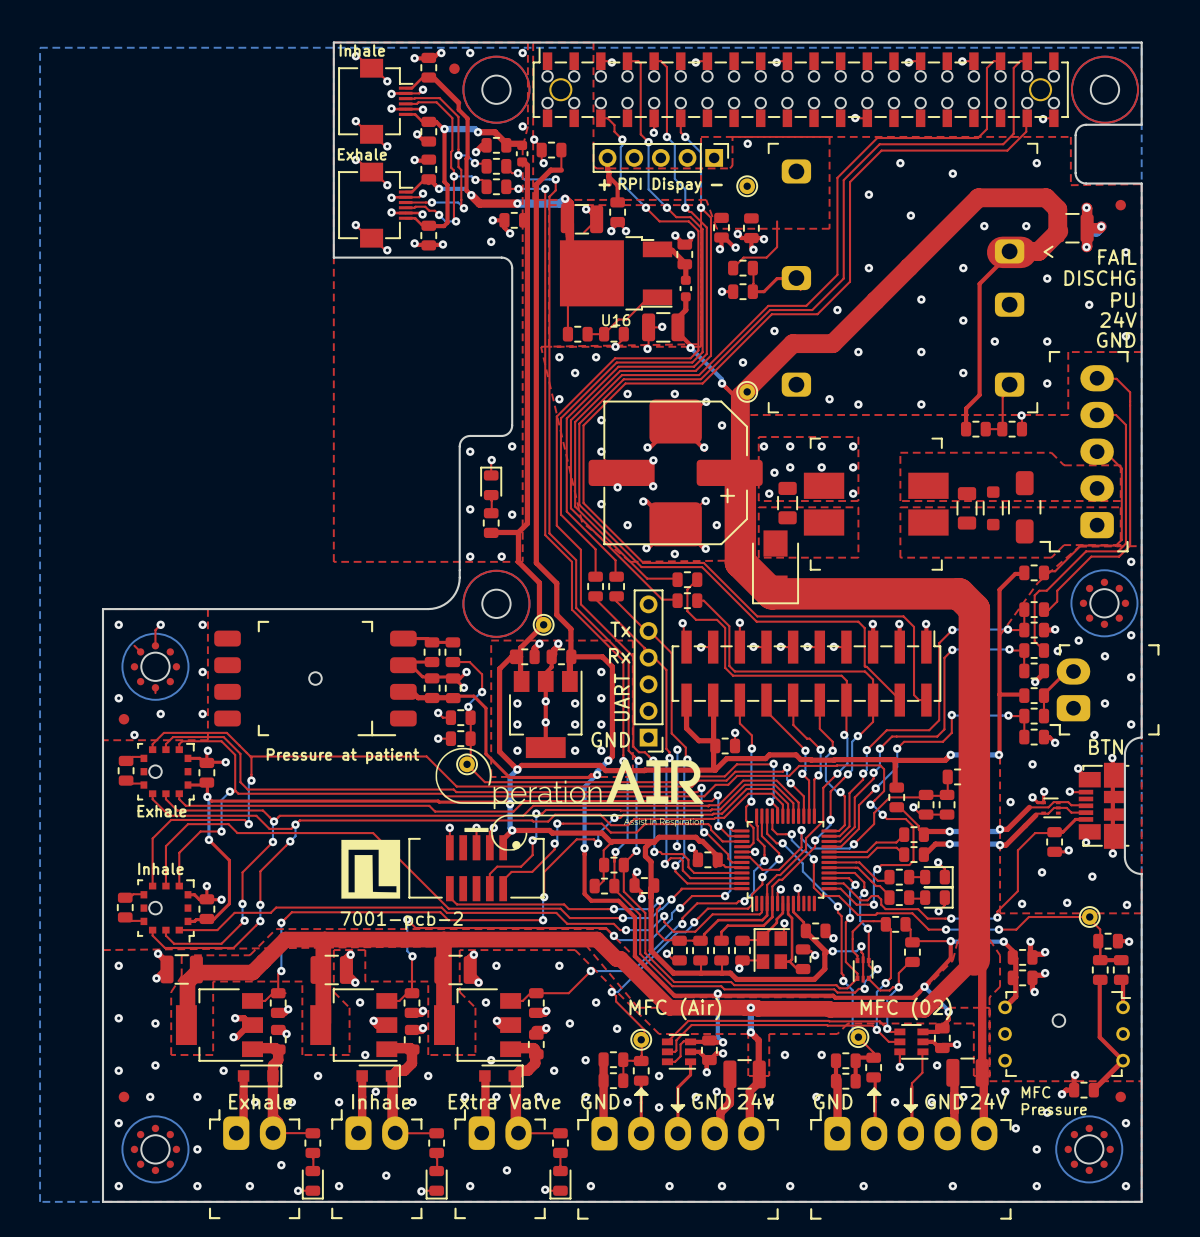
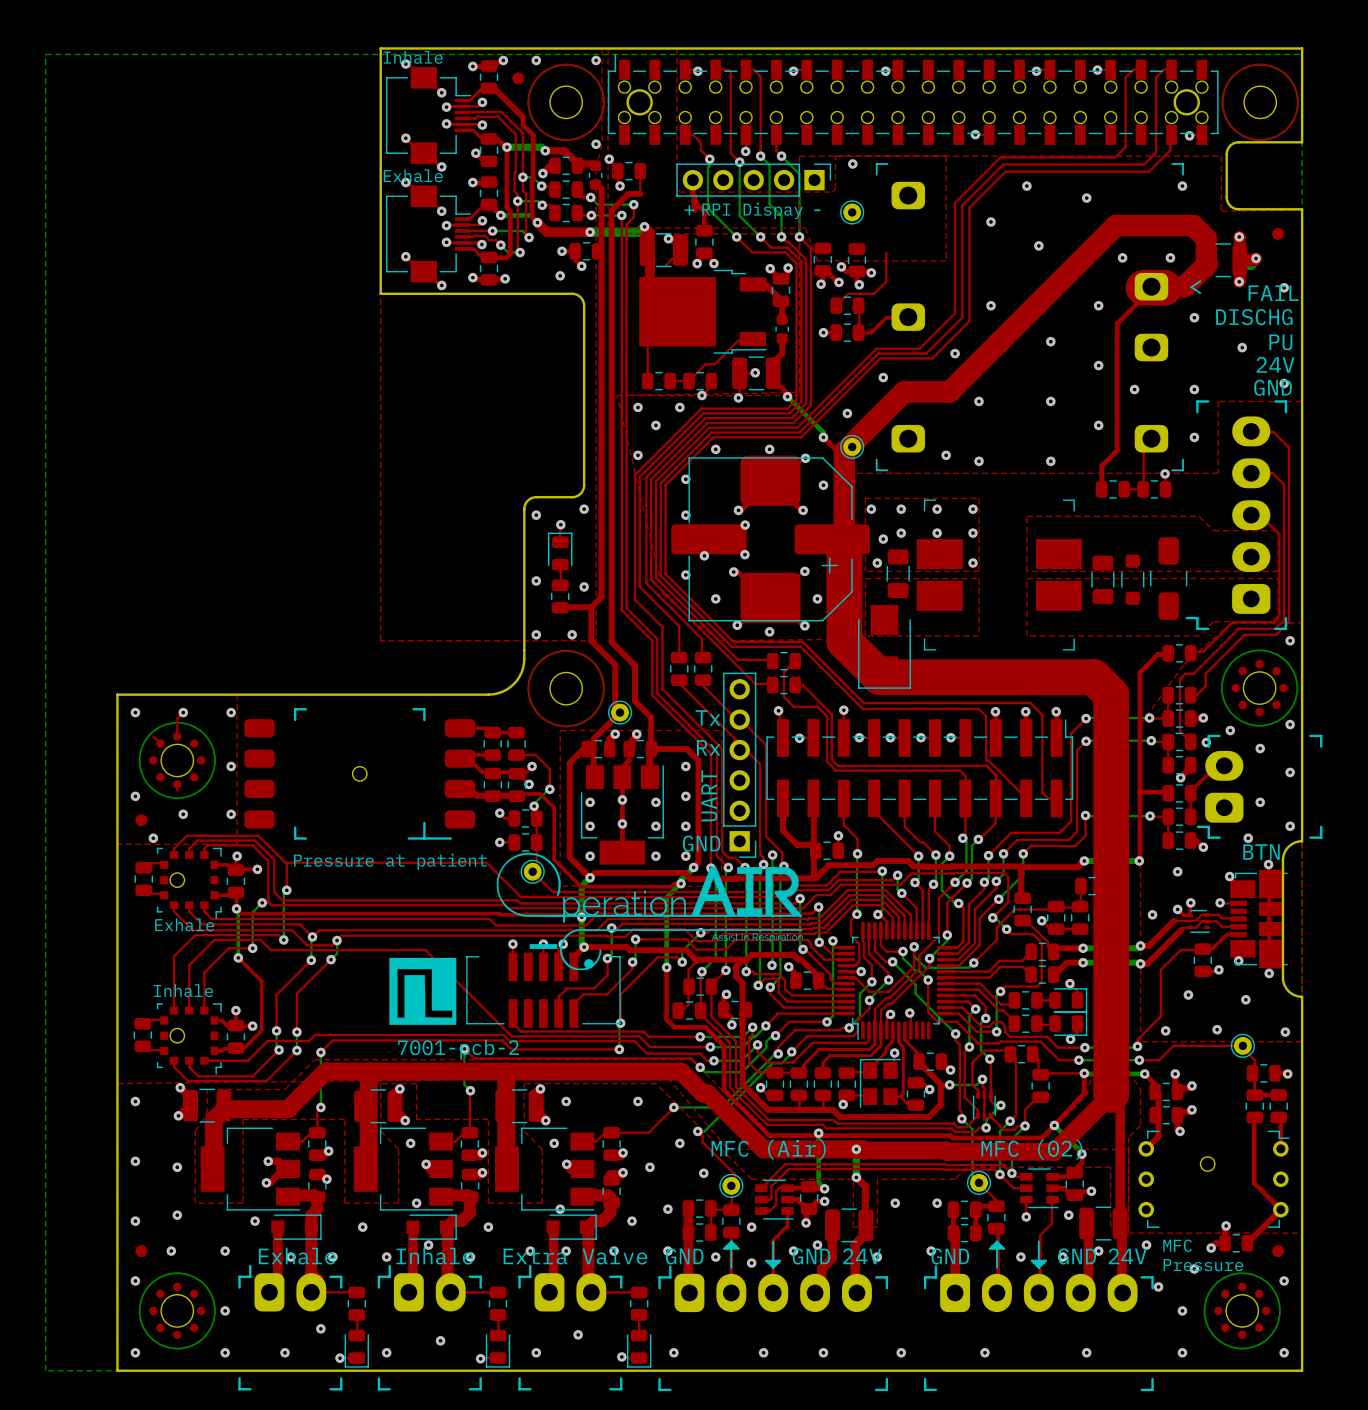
U16: (616, 273) -> none
part: none -> (702, 311)

